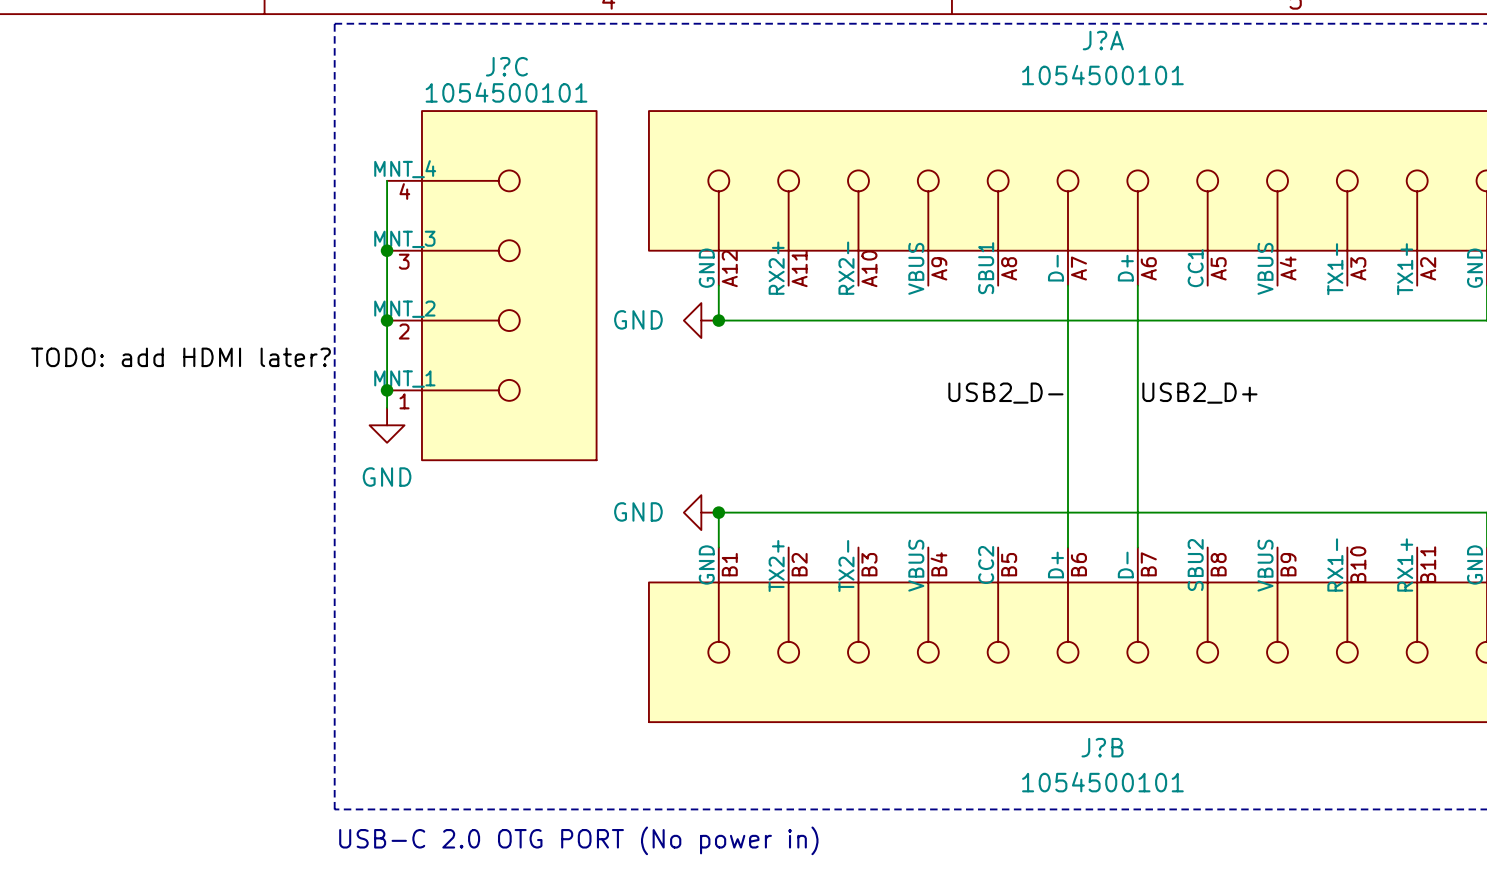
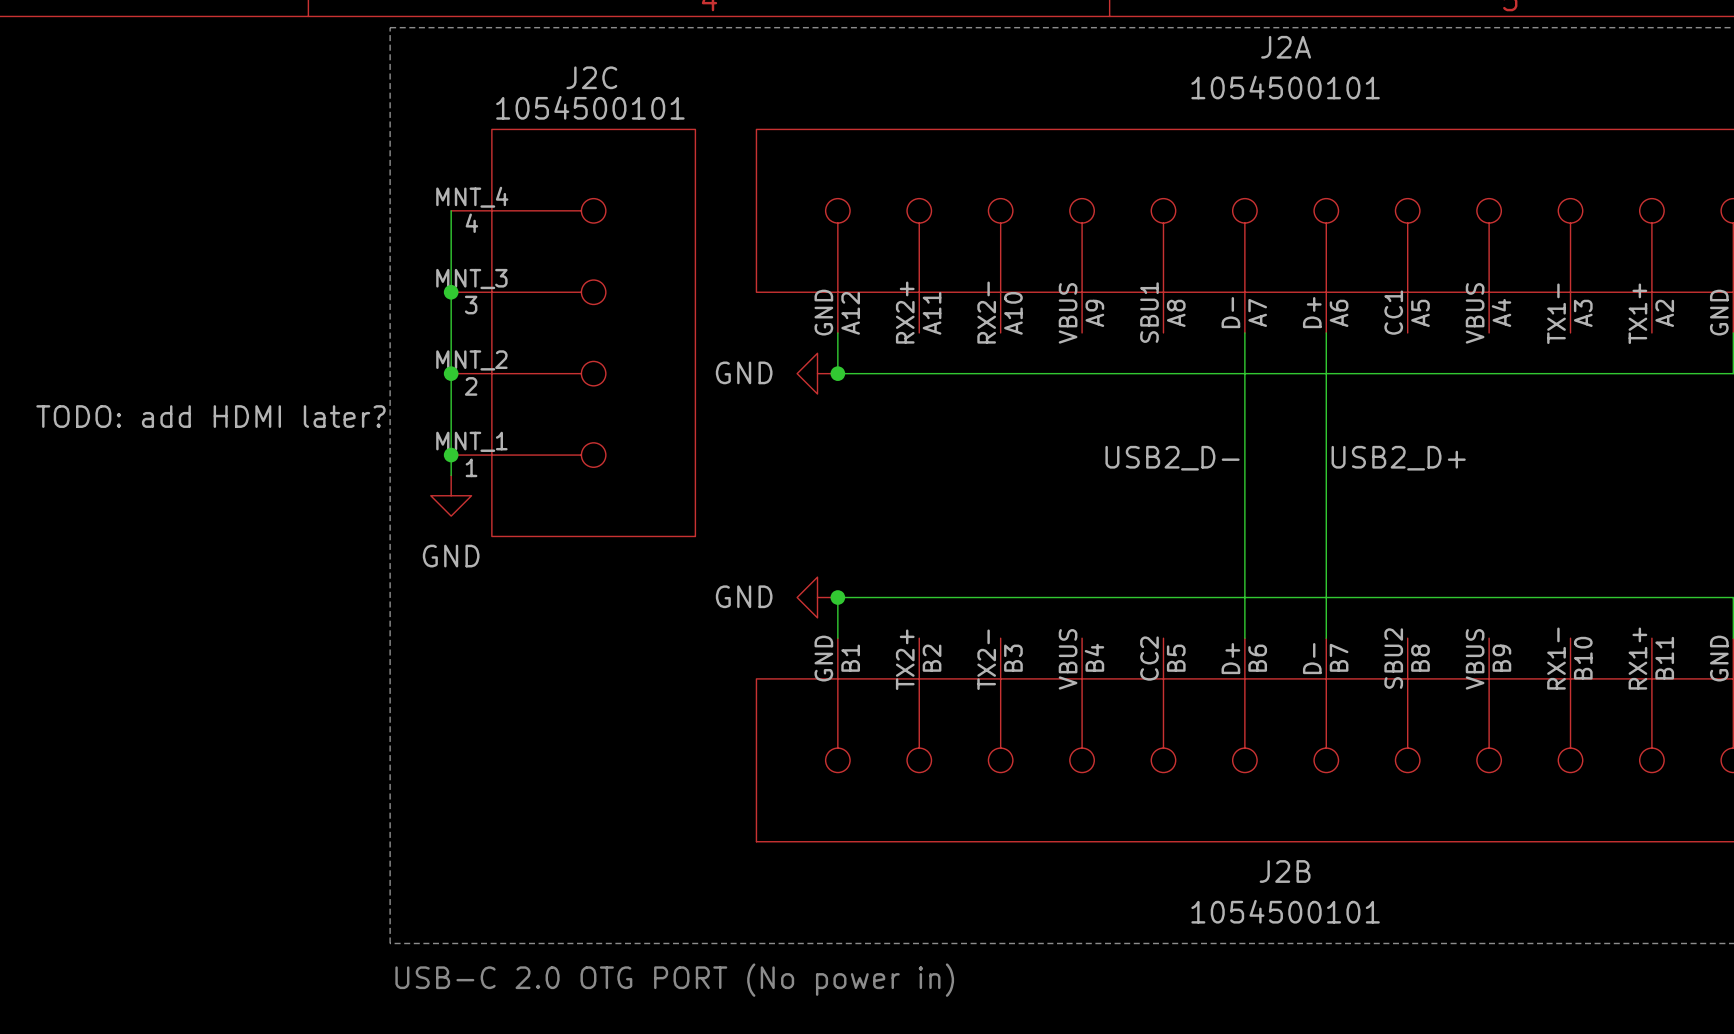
J?A name: J?A (1103, 40) -> J2A (1286, 47)
J?C name: J?C (506, 66) -> J2C (591, 77)
J?B name: J?B (1102, 747) -> J2B (1285, 871)

